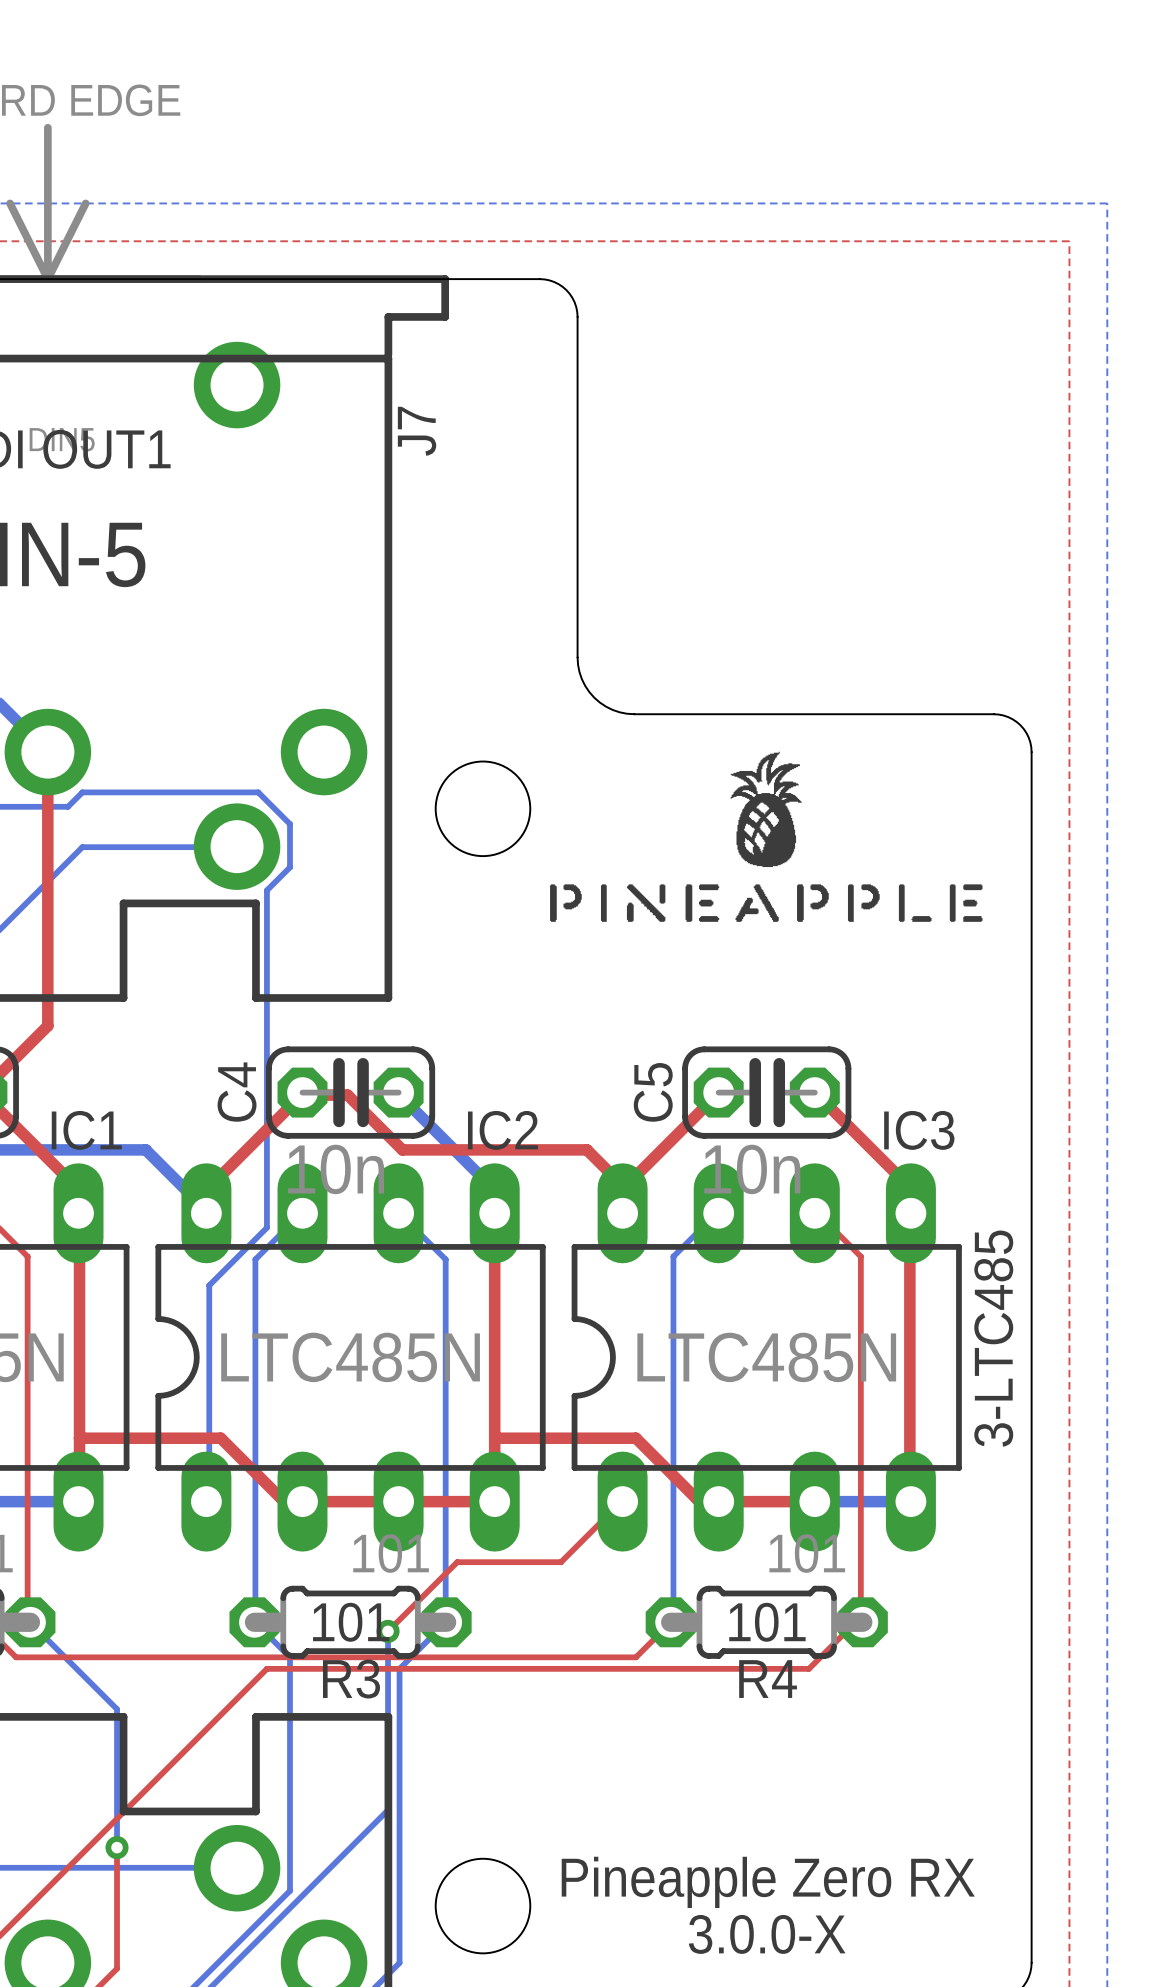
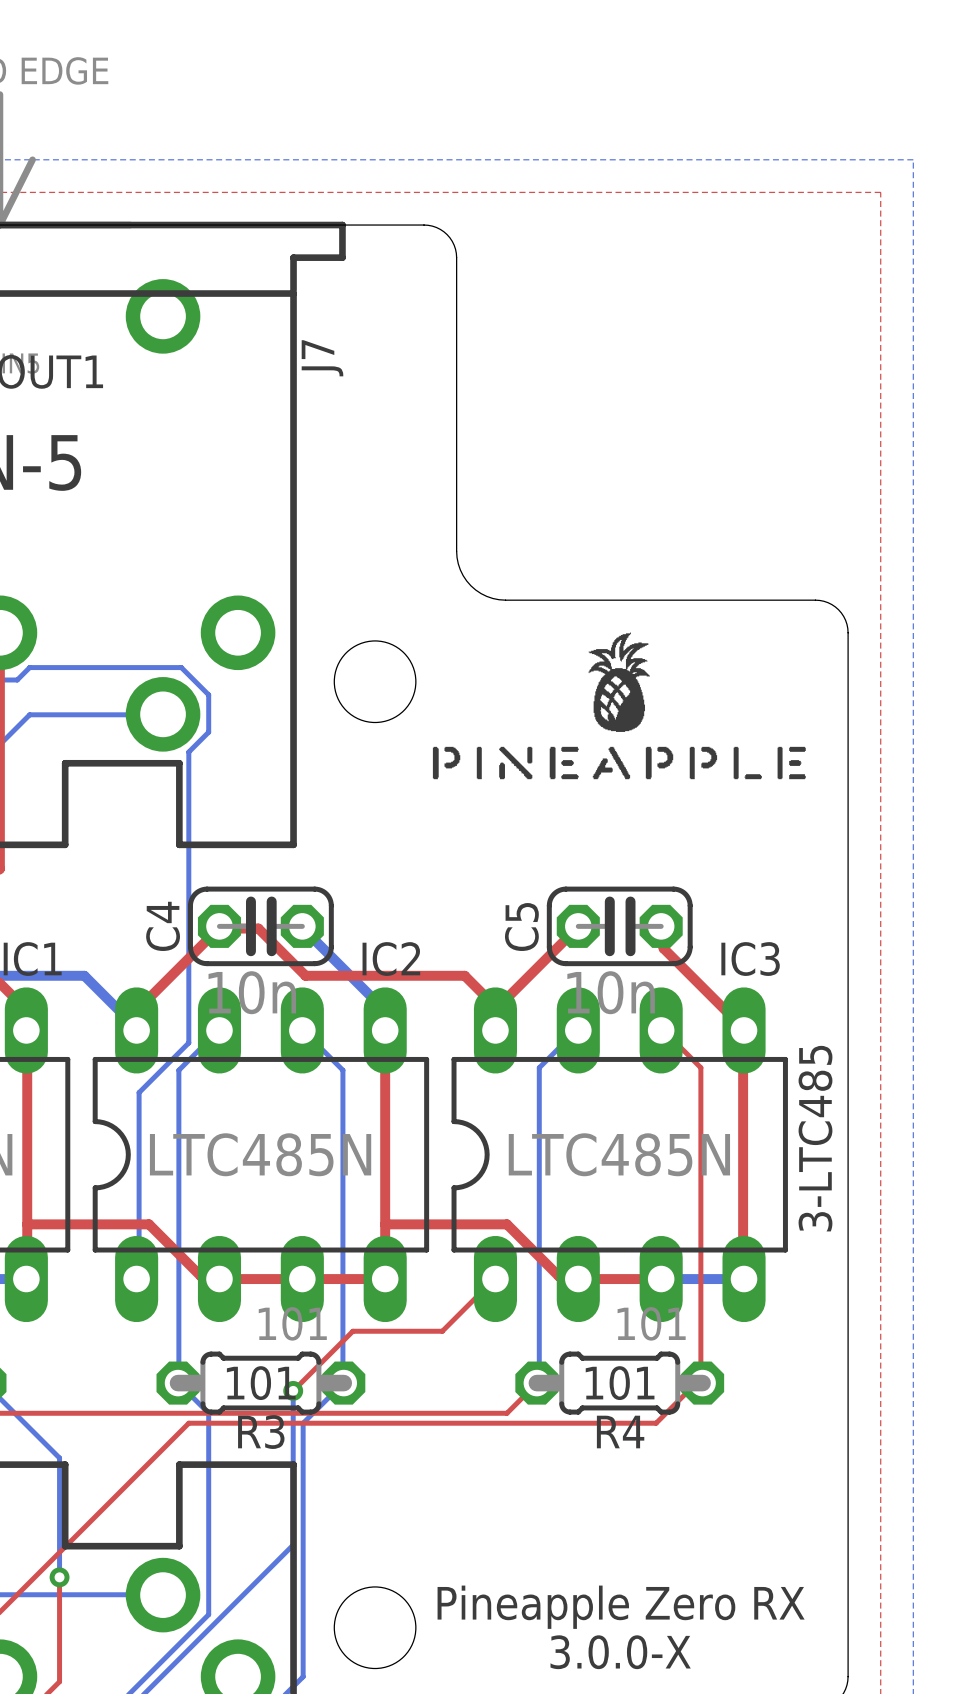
top track: (817, 1095) (909, 1187) (909, 1210) -> (663, 928) (663, 948) (743, 1027)

